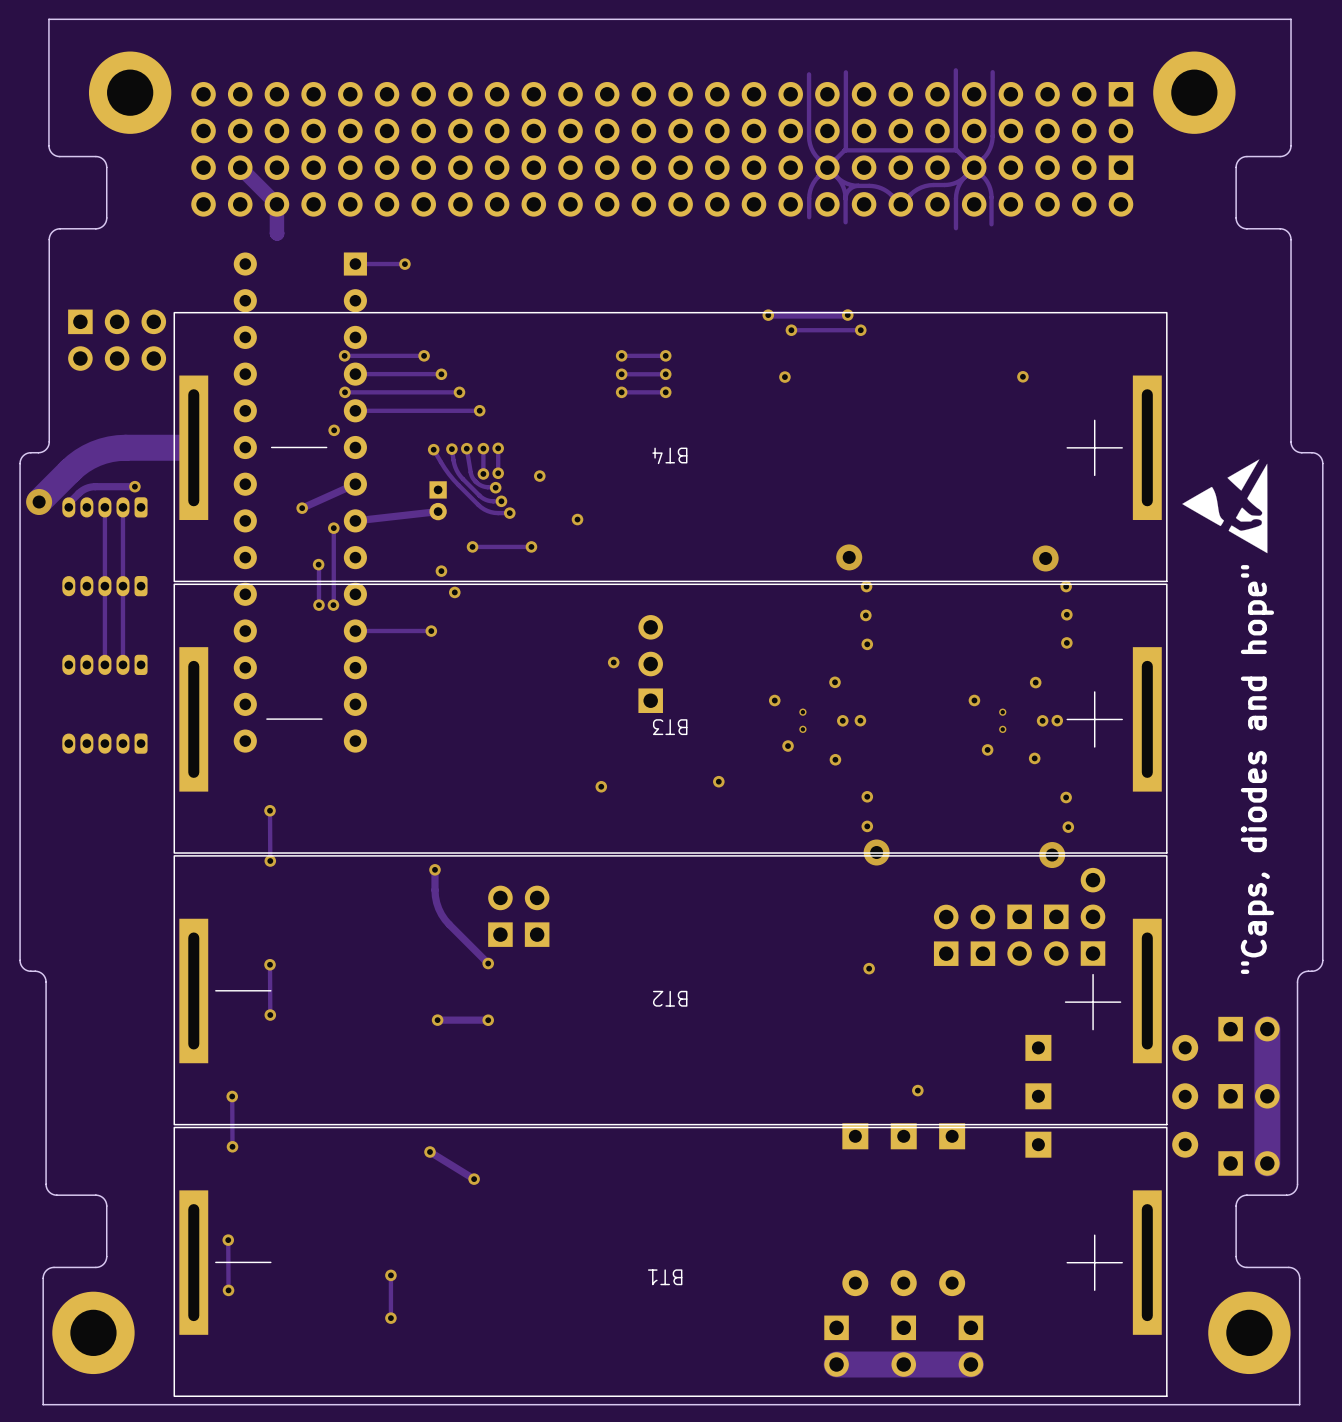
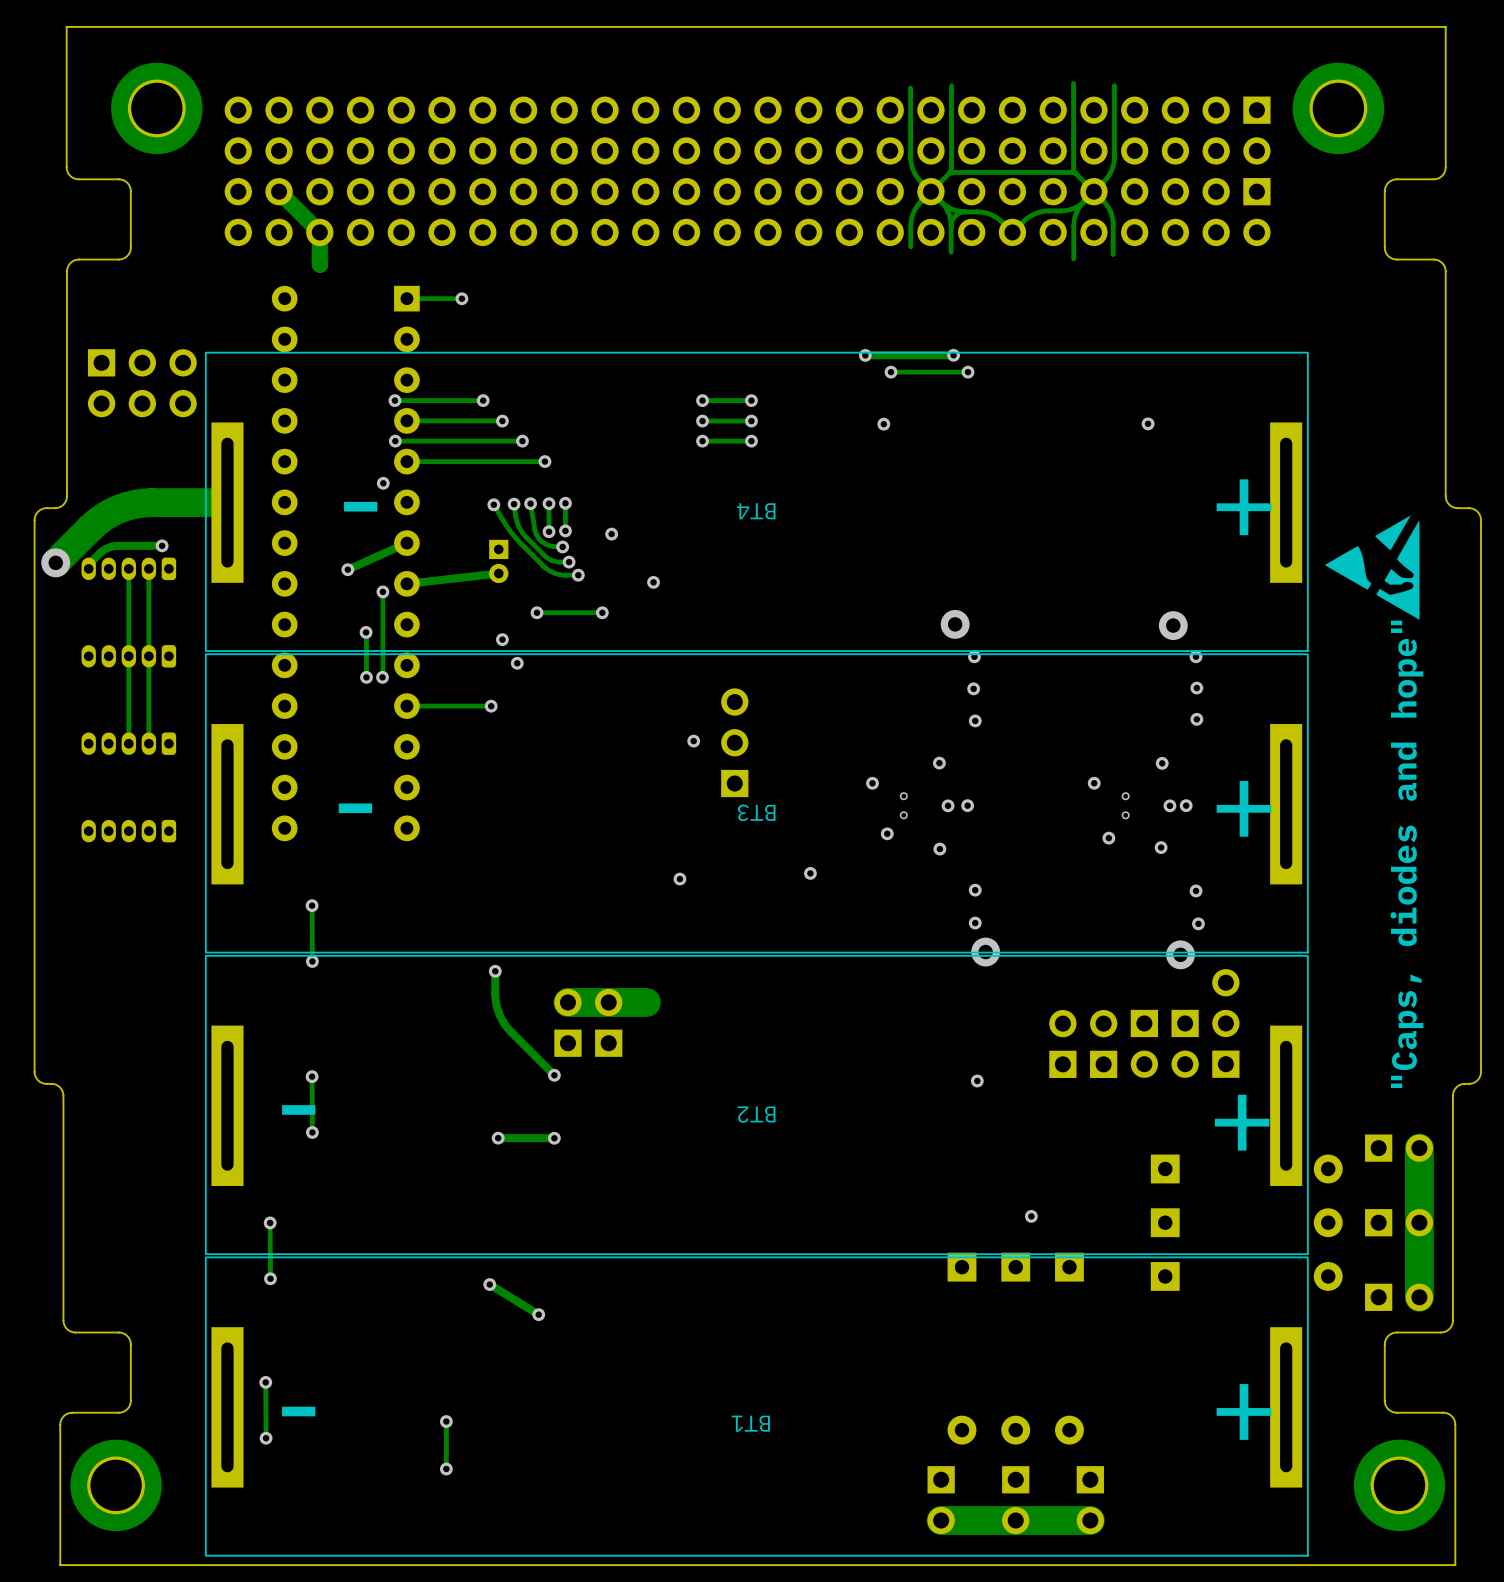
track: none -> (646, 1002) (567, 1002)

